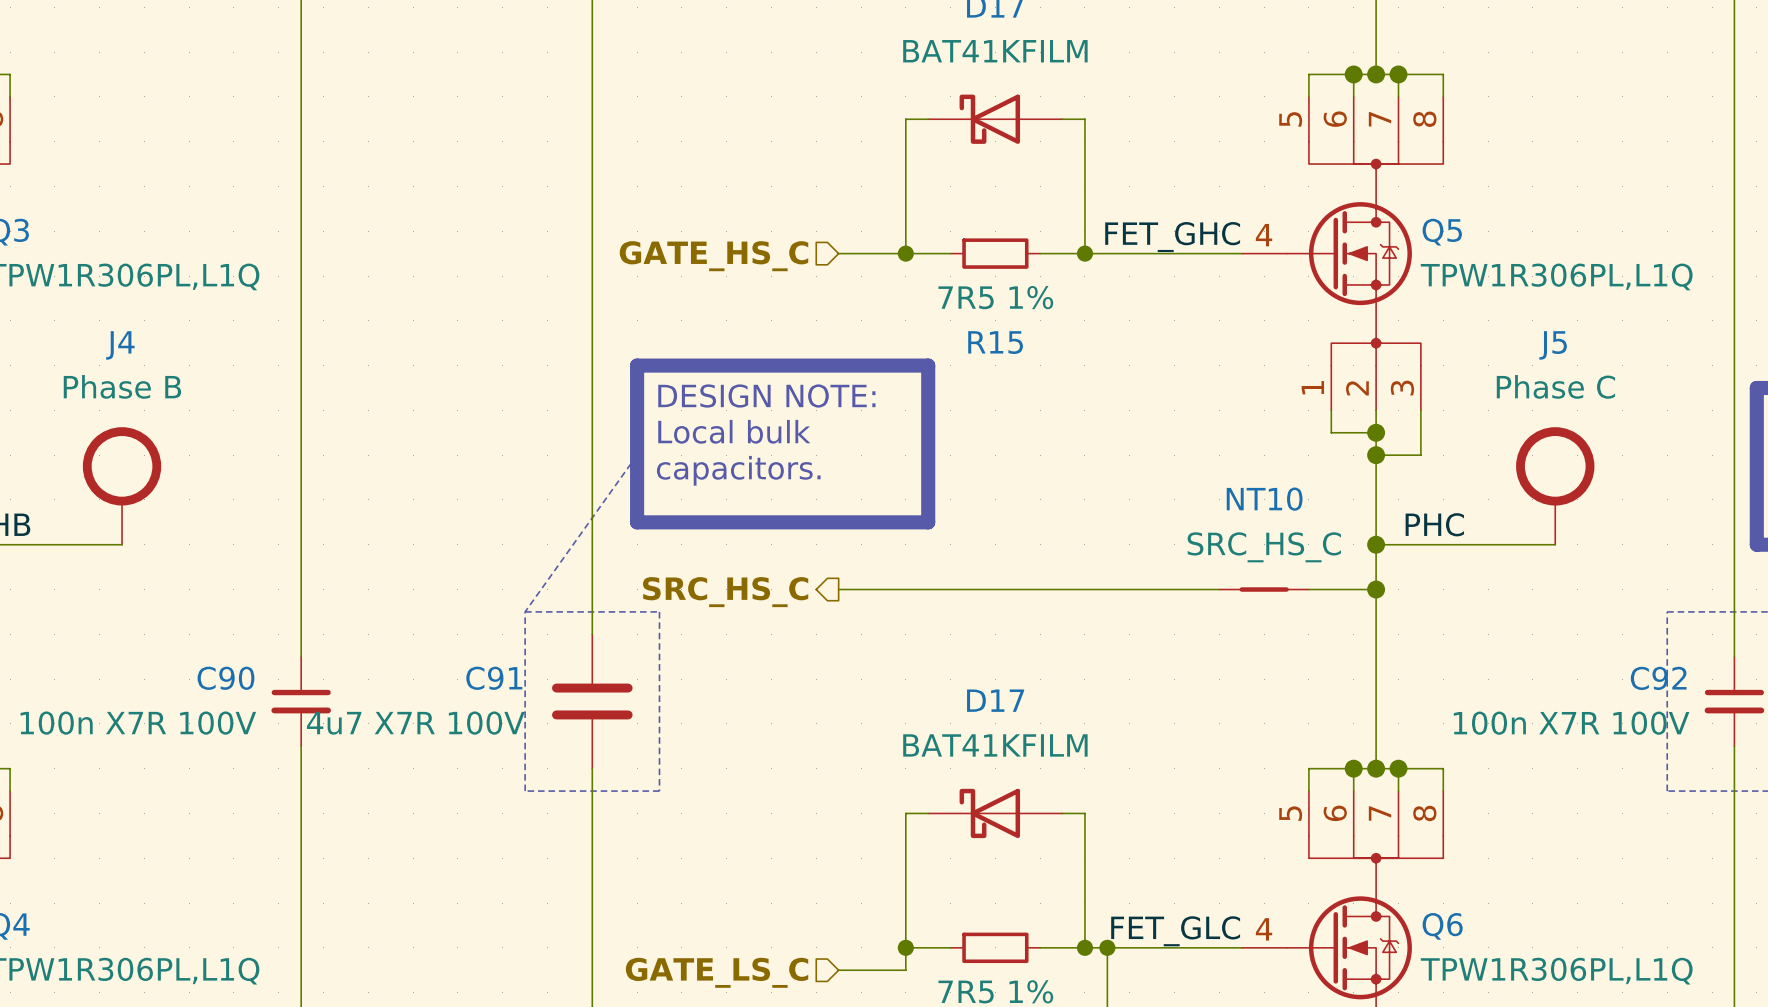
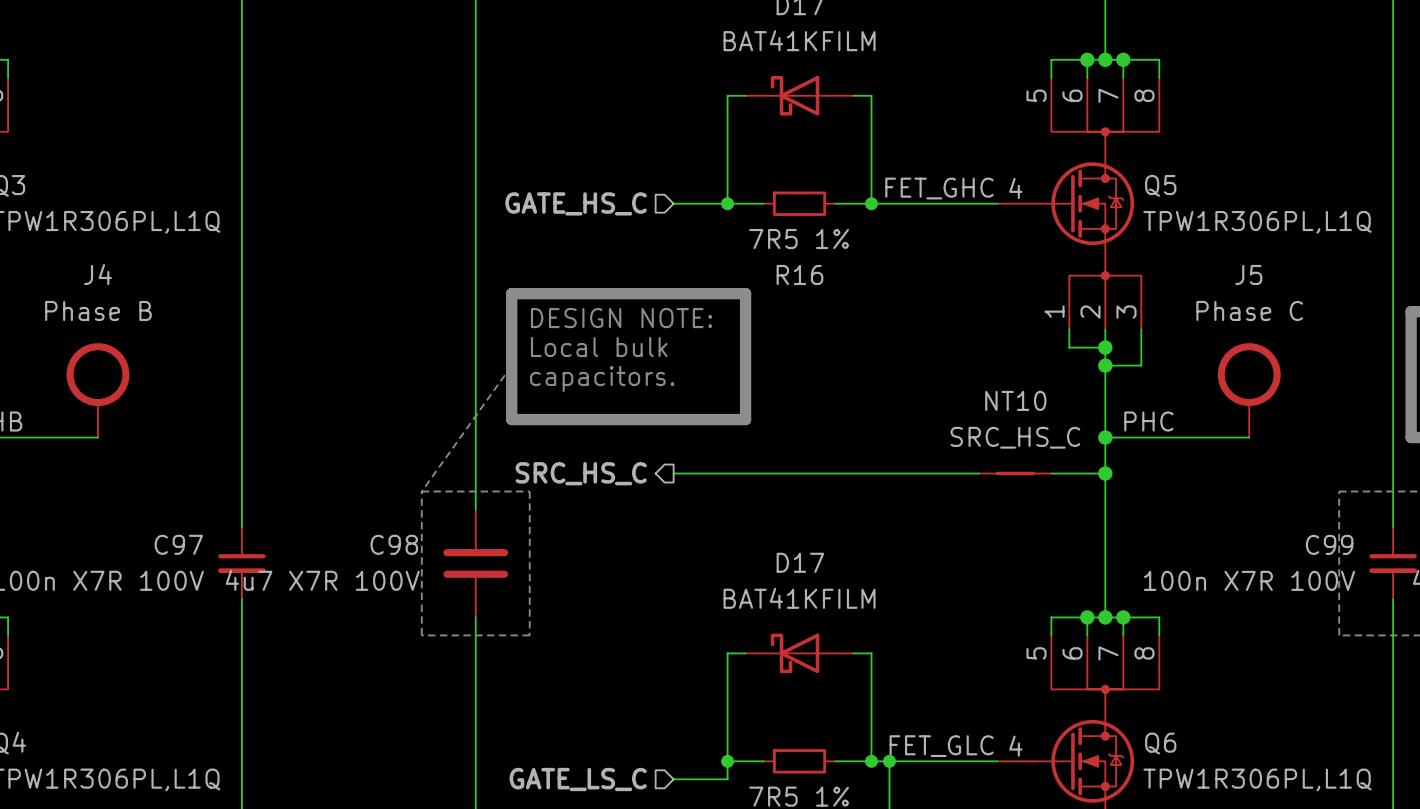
R15 name: R15 (995, 342) -> R16 (799, 274)
C90 name: C90 (225, 678) -> C97 (178, 544)
C91 name: C91 (494, 678) -> C98 (394, 544)
C92 name: C92 (1658, 678) -> C99 (1329, 544)

